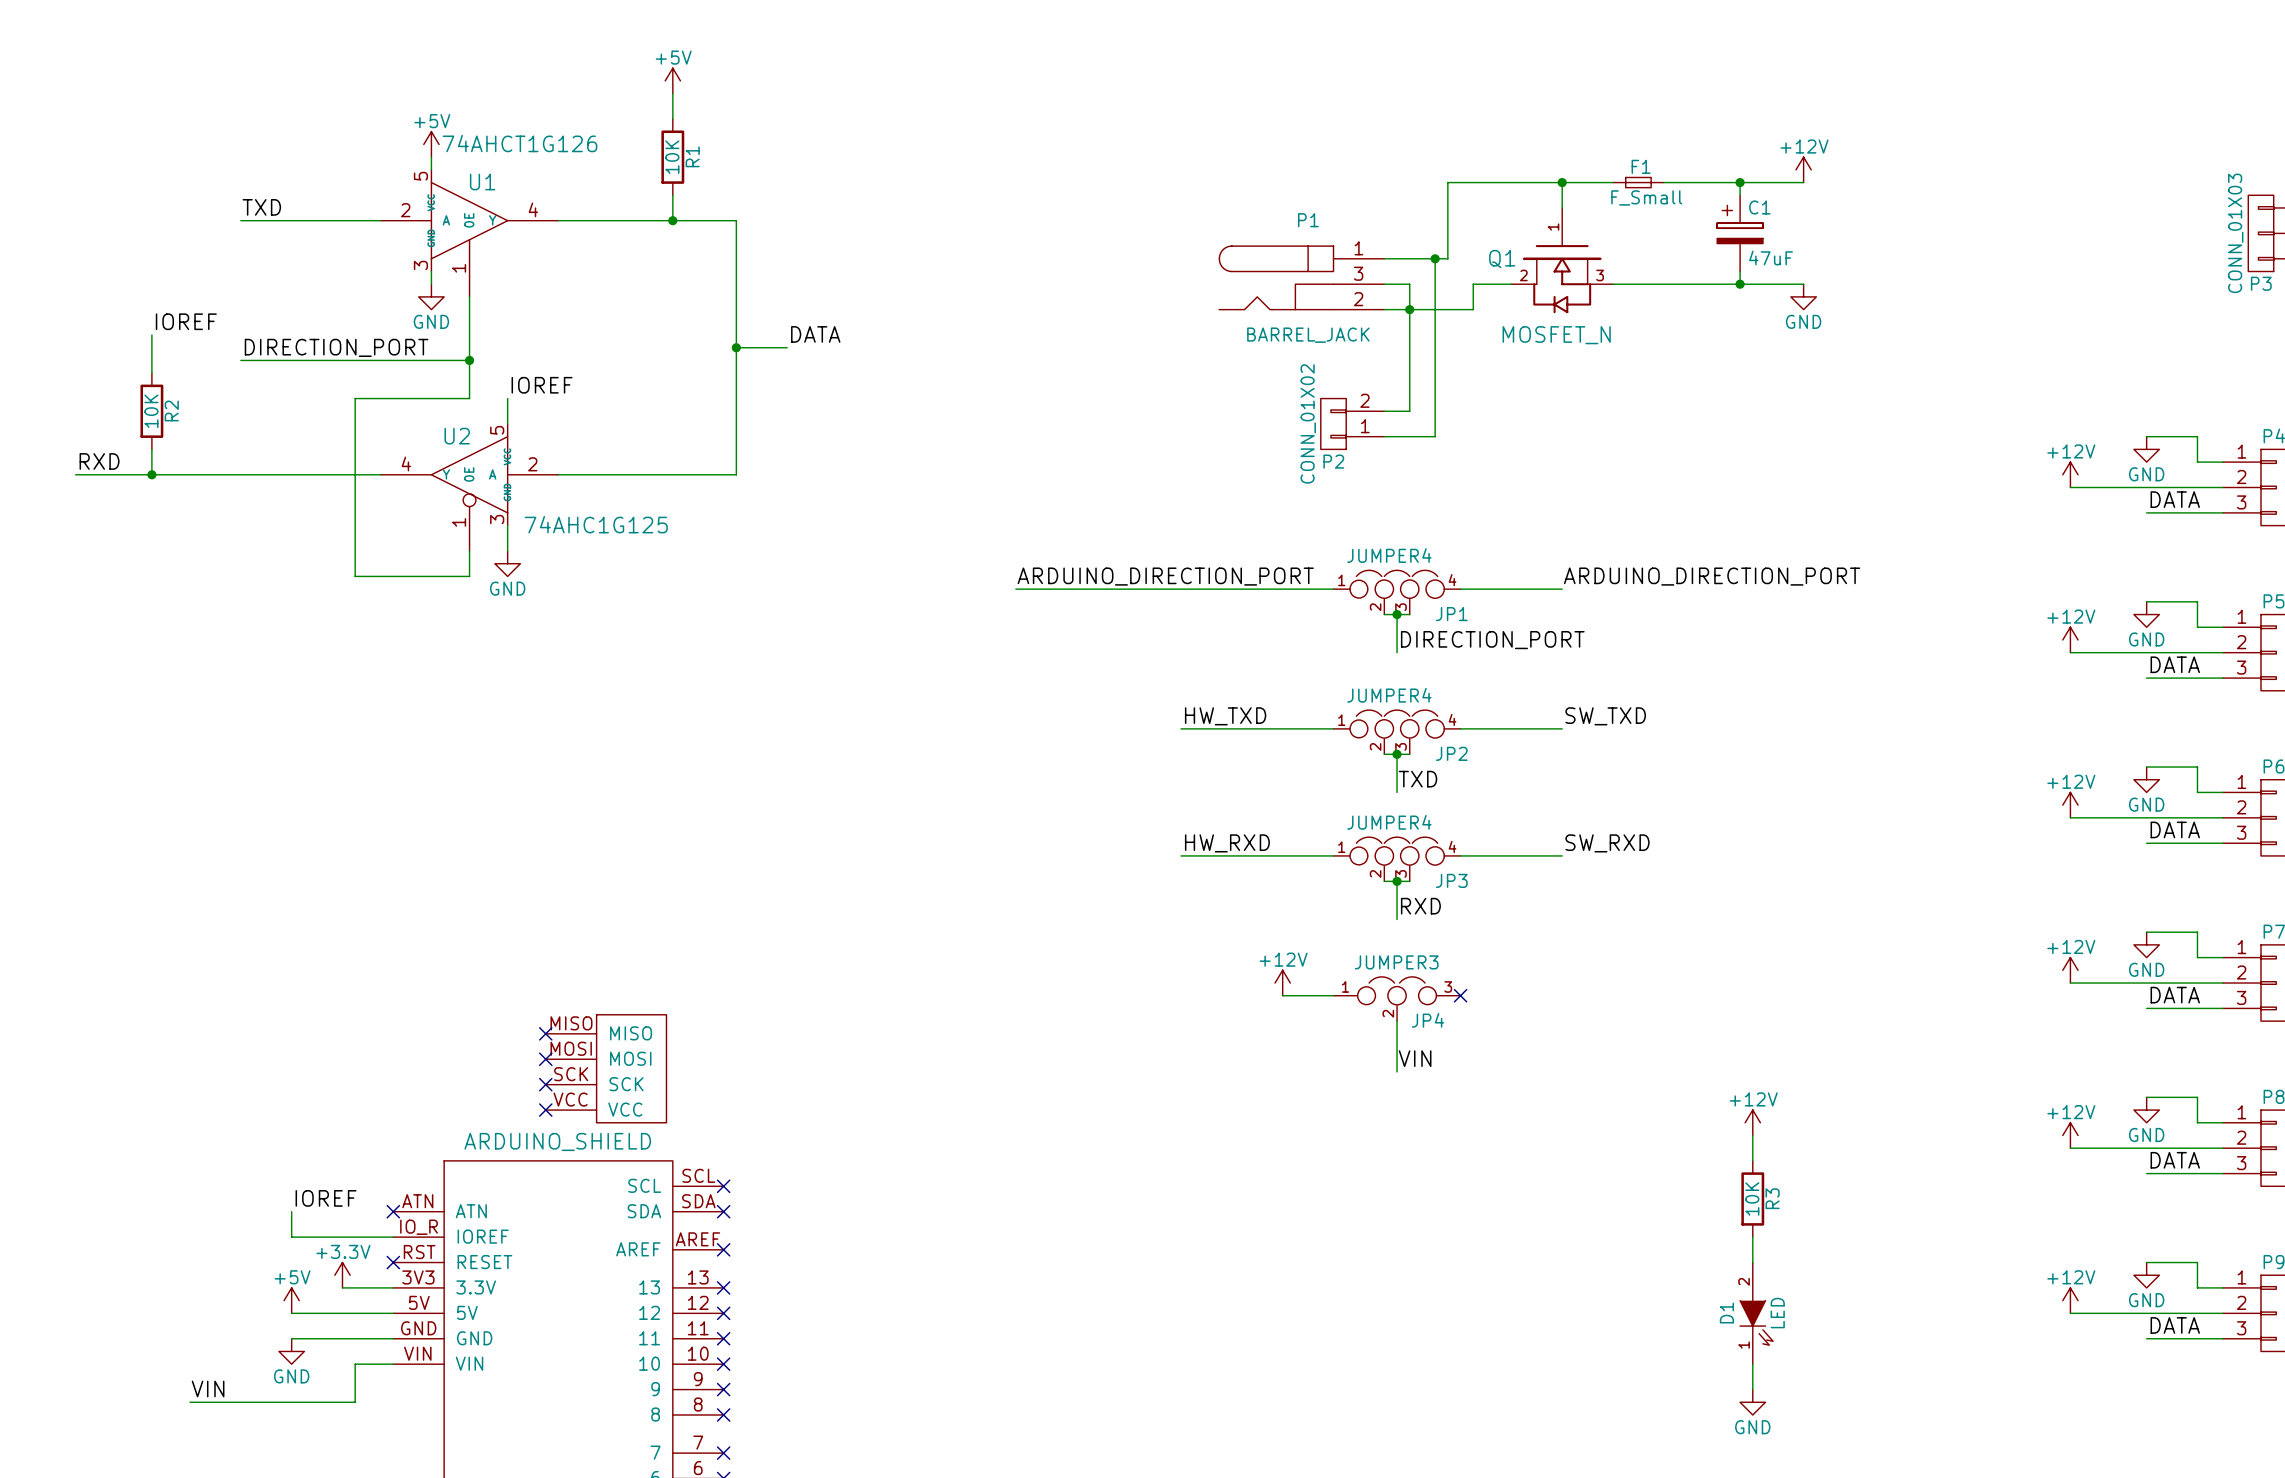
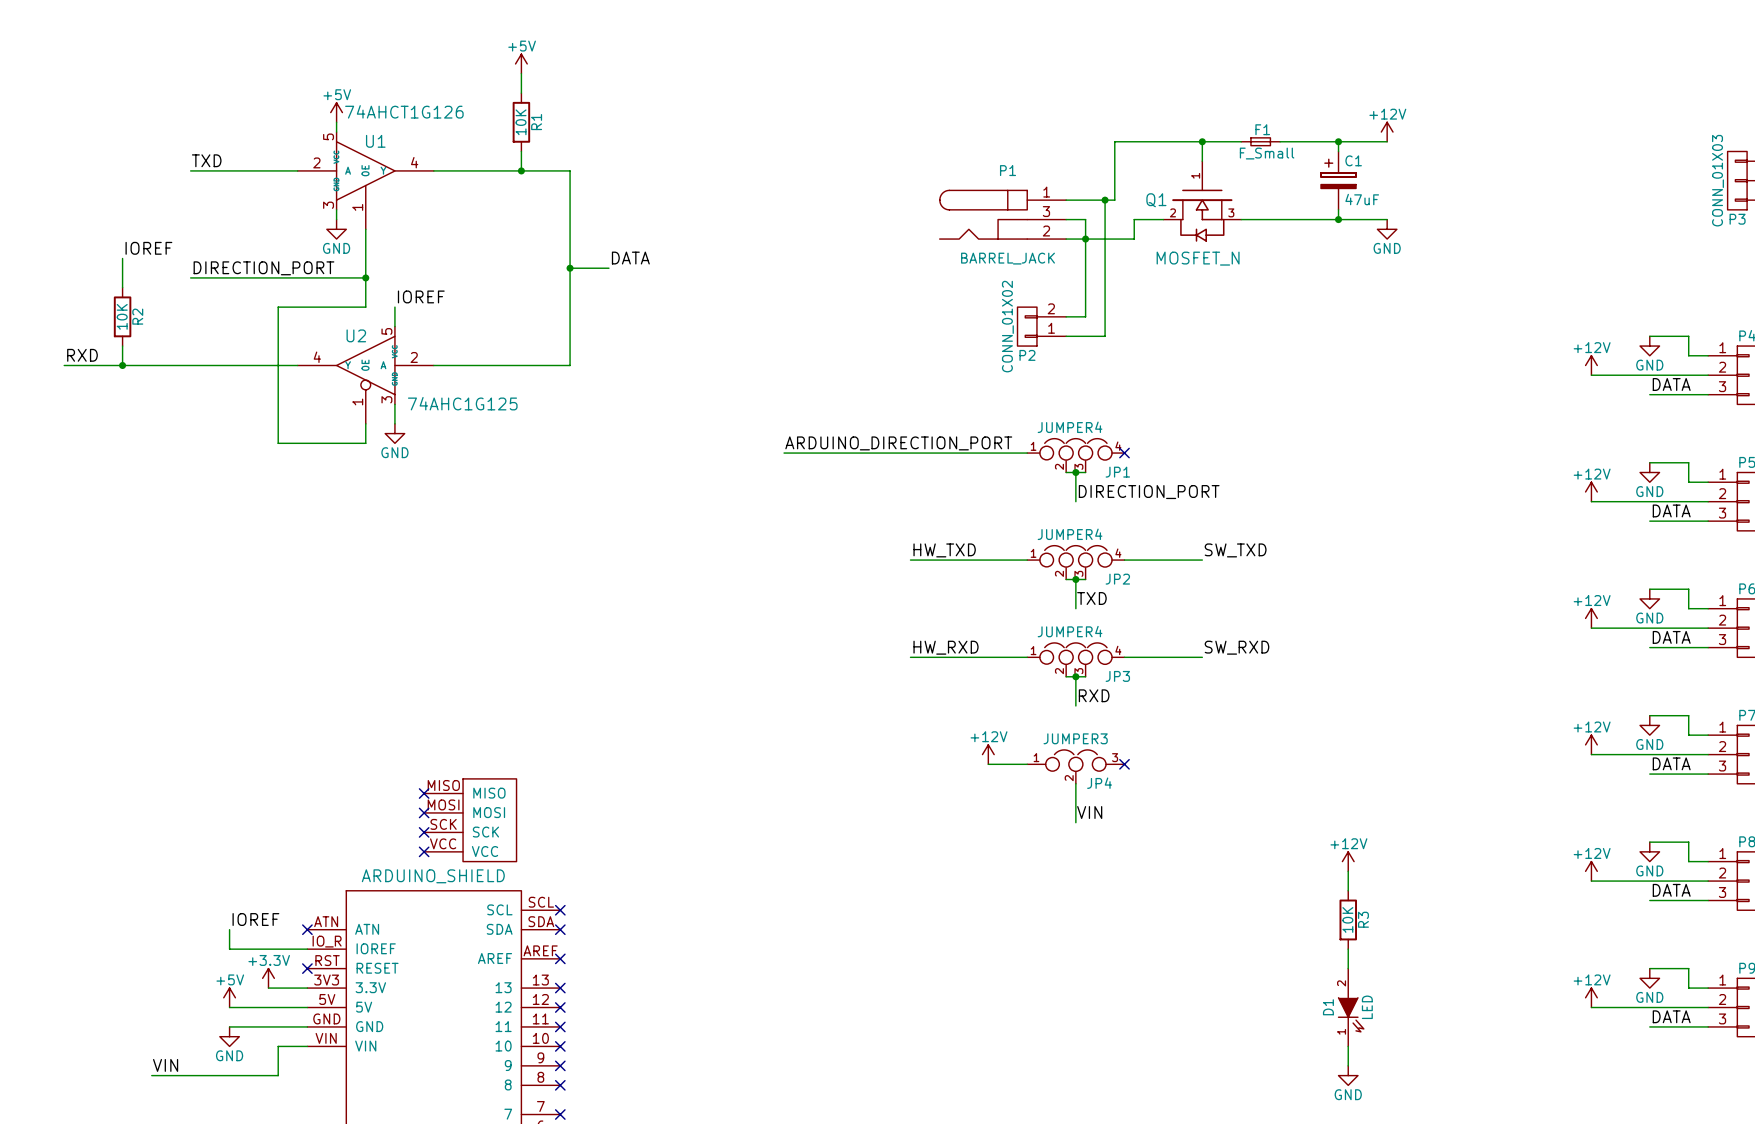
label: ARDUINO_DIRECTION_PORT (1712, 576) -> none
wire: (1460, 589) (1562, 589) -> none
no-connect mark: none -> (1124, 453)

